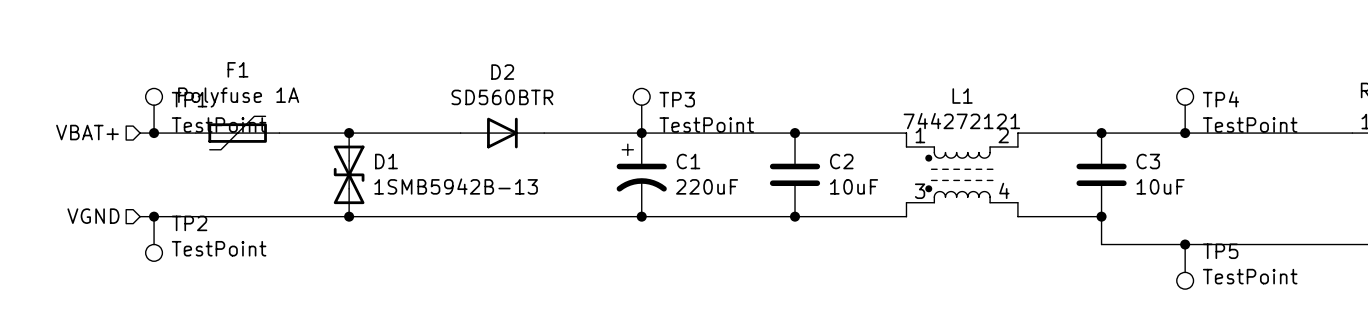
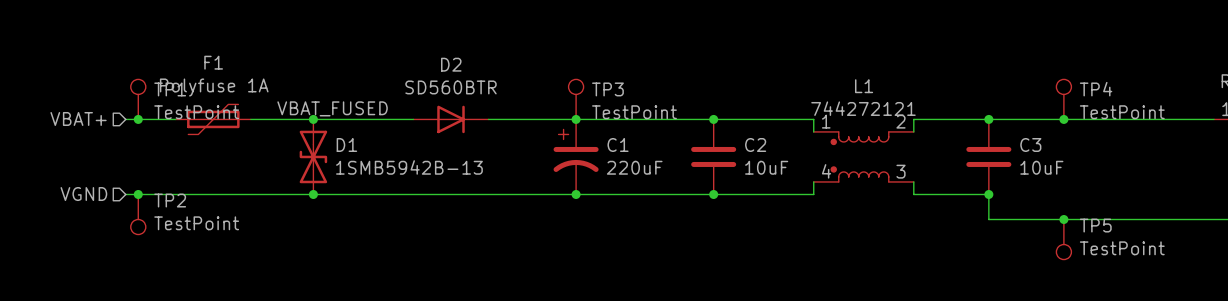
label: none -> VBAT_FUSED (332, 108)
L1 symbol: [906, 146, 1018, 203] -> [813, 131, 914, 182]

